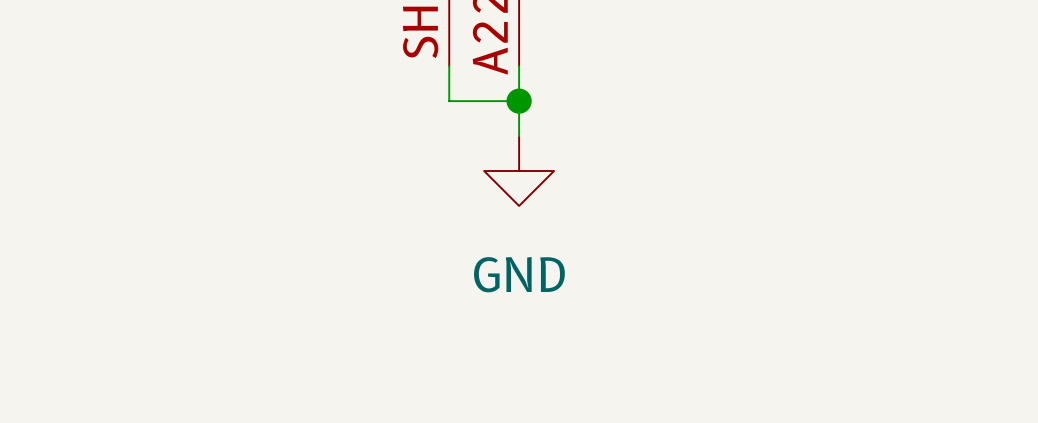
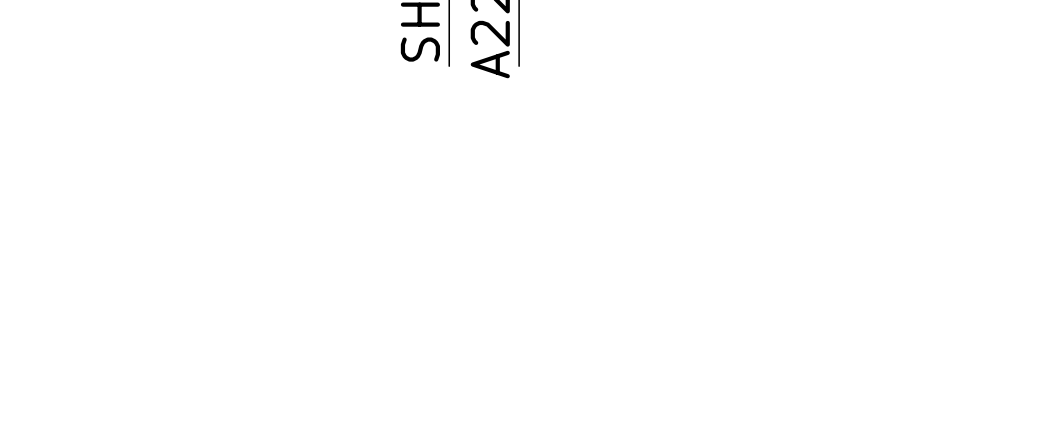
wire: (449, 66) (449, 101) (519, 101) -> none
wire: (519, 66) (519, 136) -> none
junction: (519, 101) -> none
power symbol: GND (519, 171) -> none

